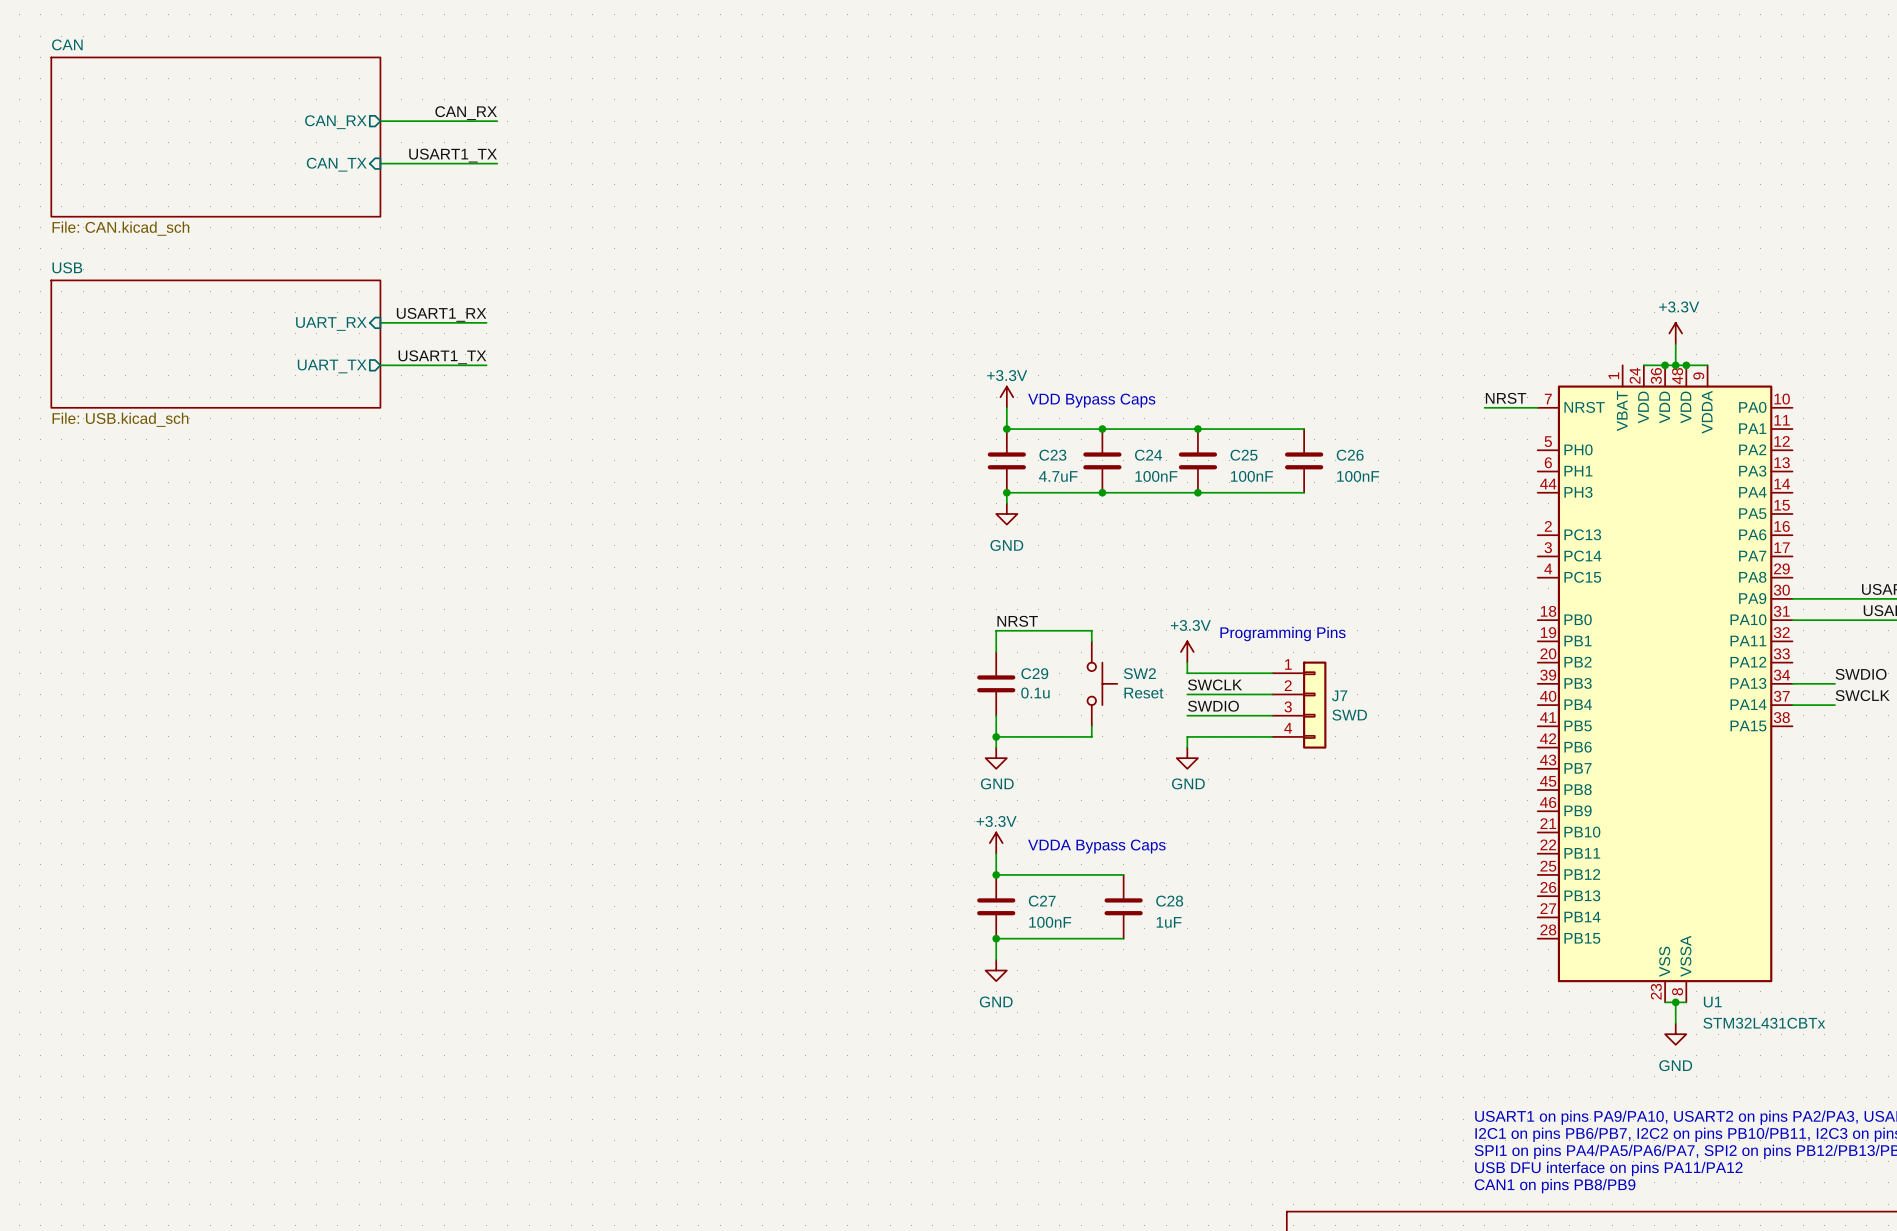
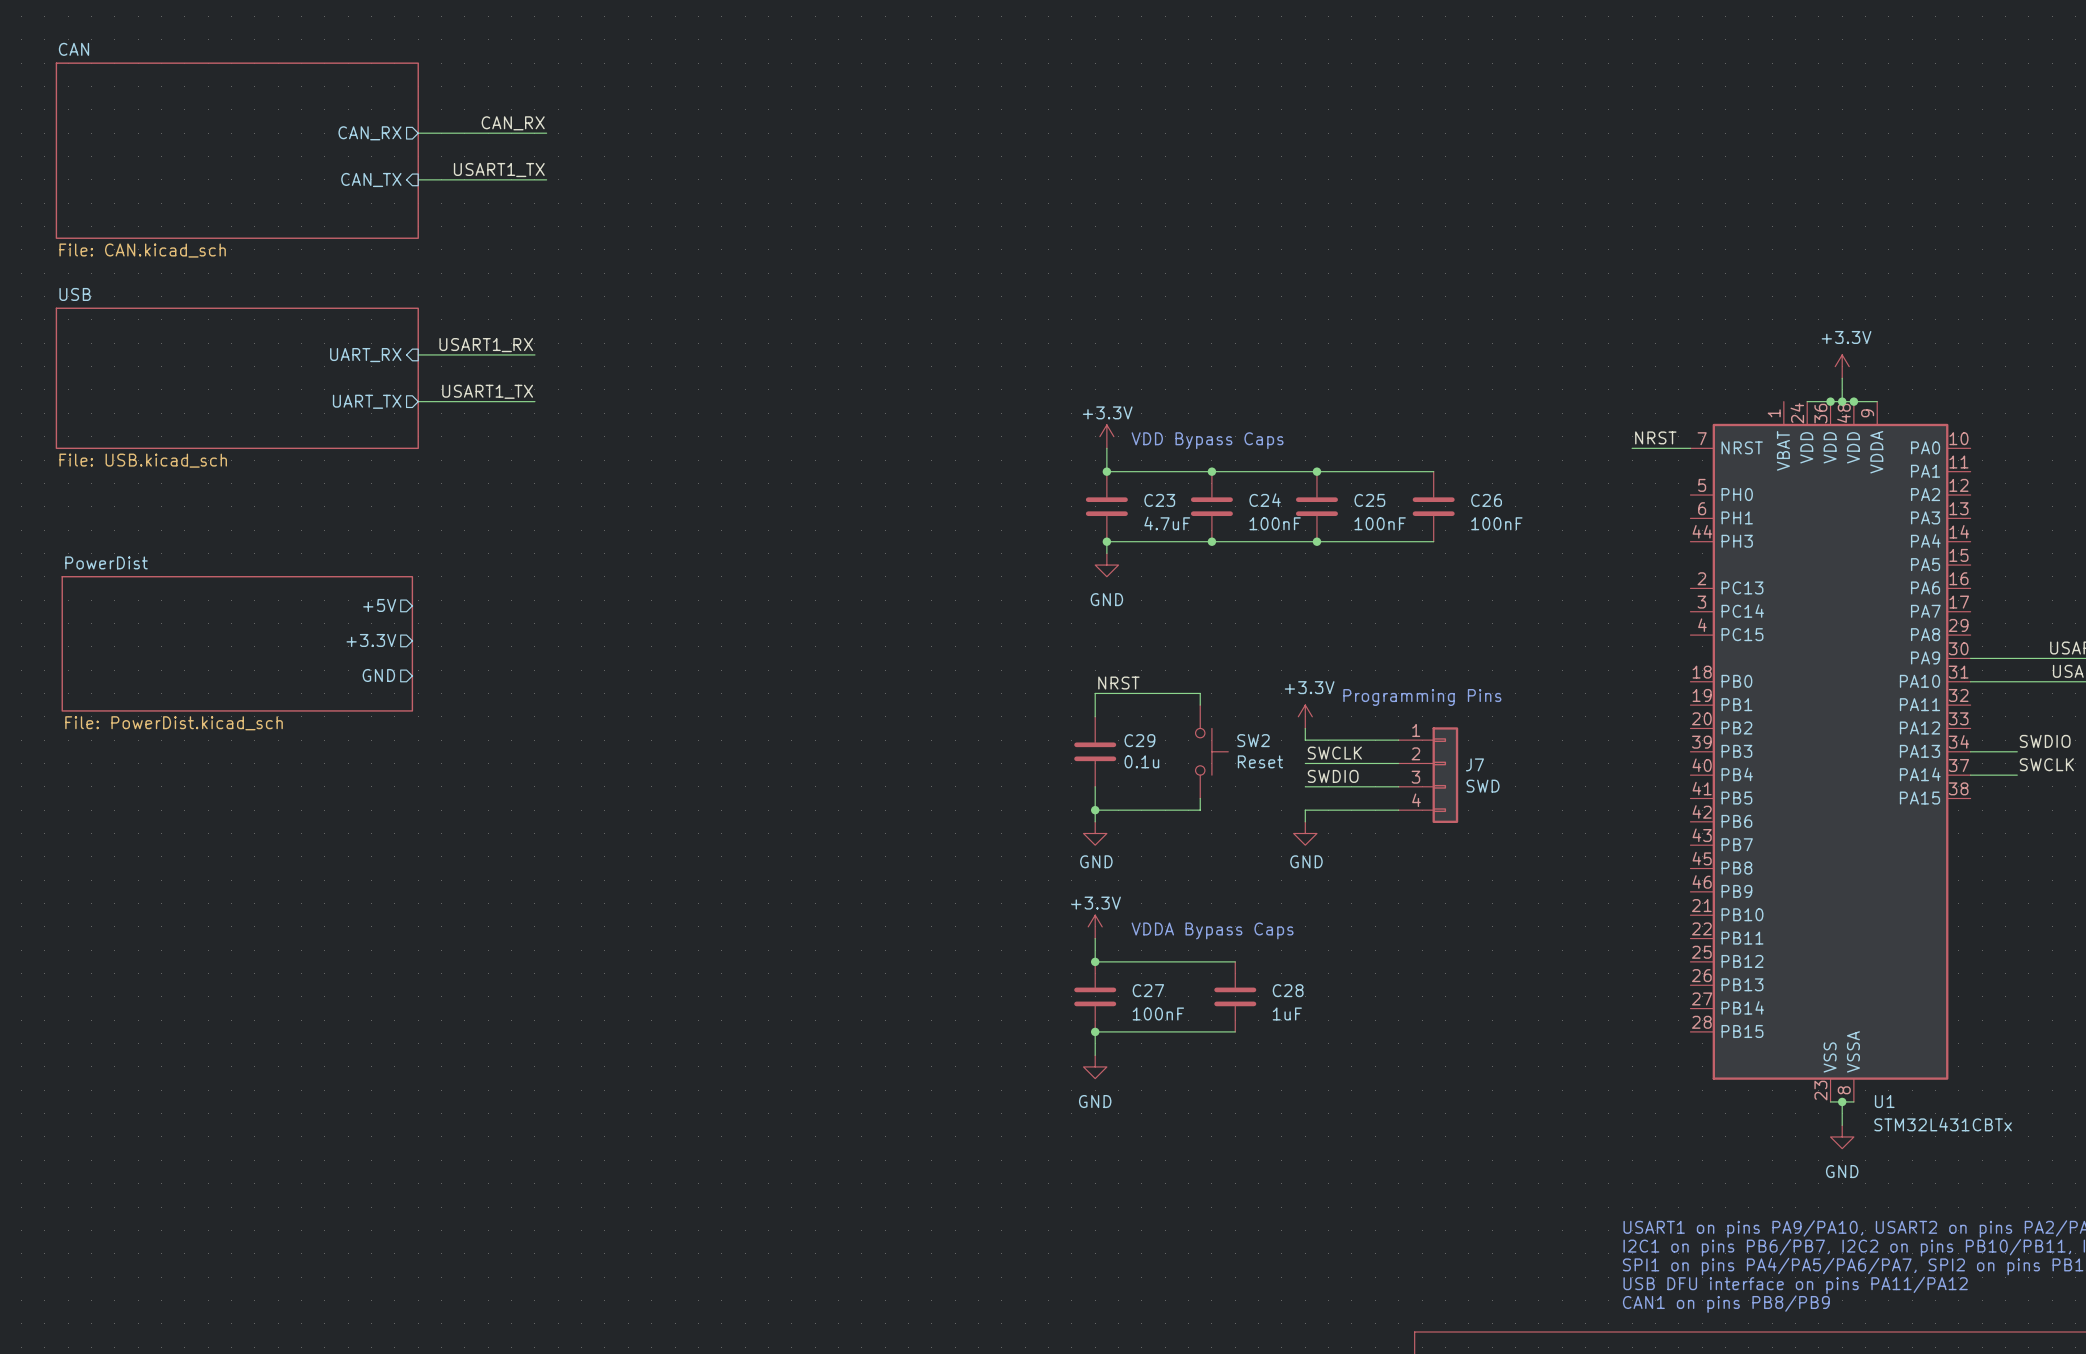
sheet pin: none -> +5V (379, 605)
sheet pin: none -> +3.3V (371, 640)
sheet PowerDist: none -> File: PowerDist.kicad_sch (237, 643)
sheet pin: none -> GND (378, 675)

